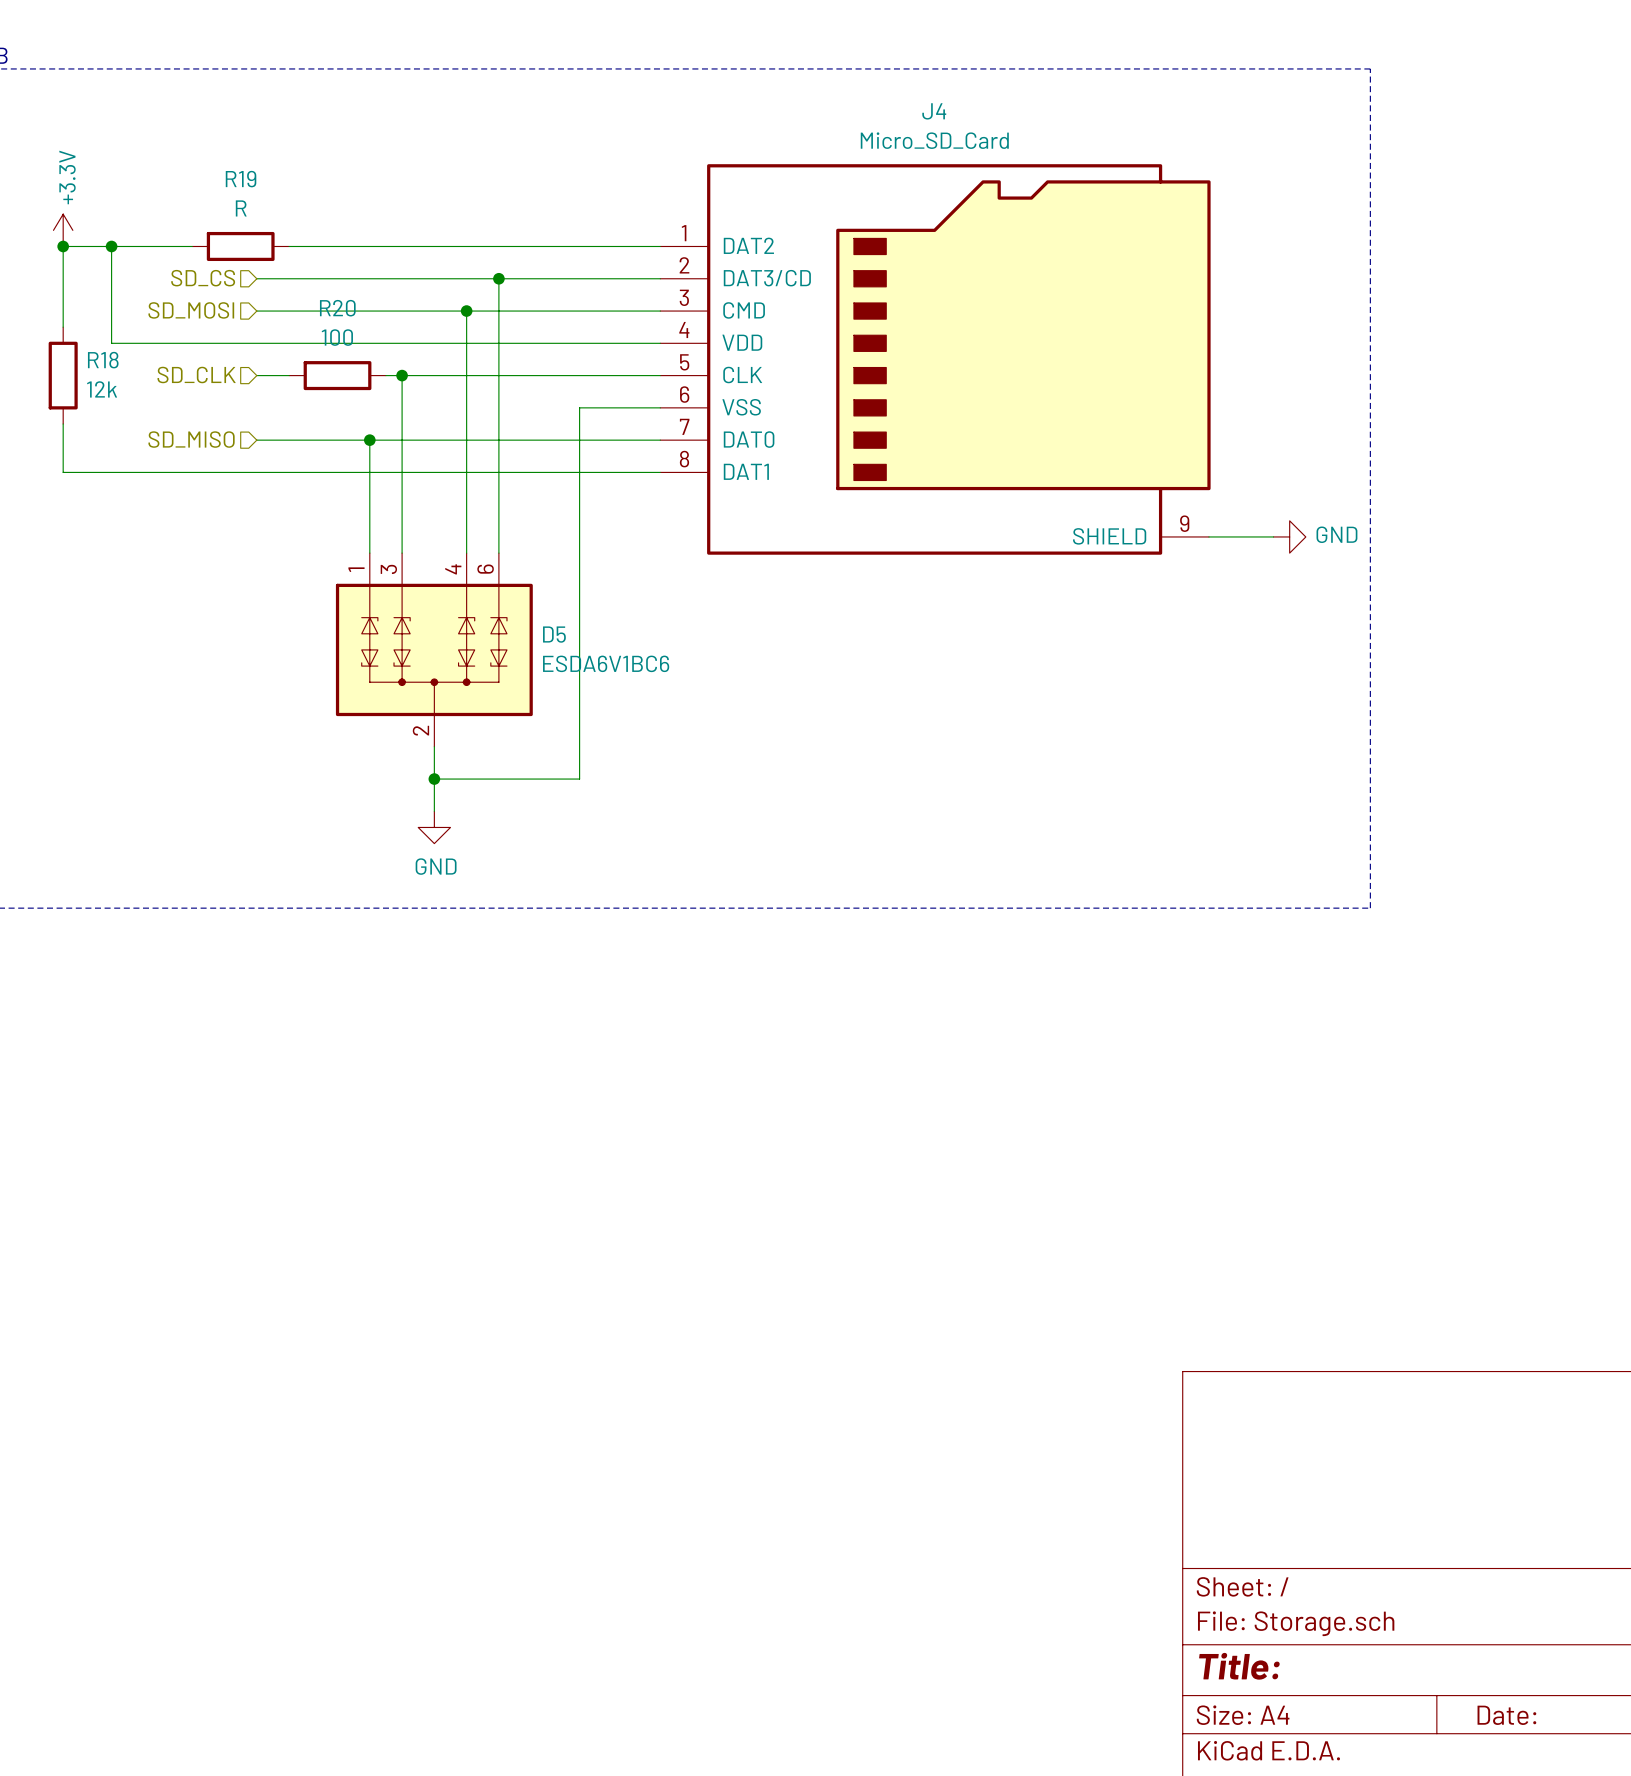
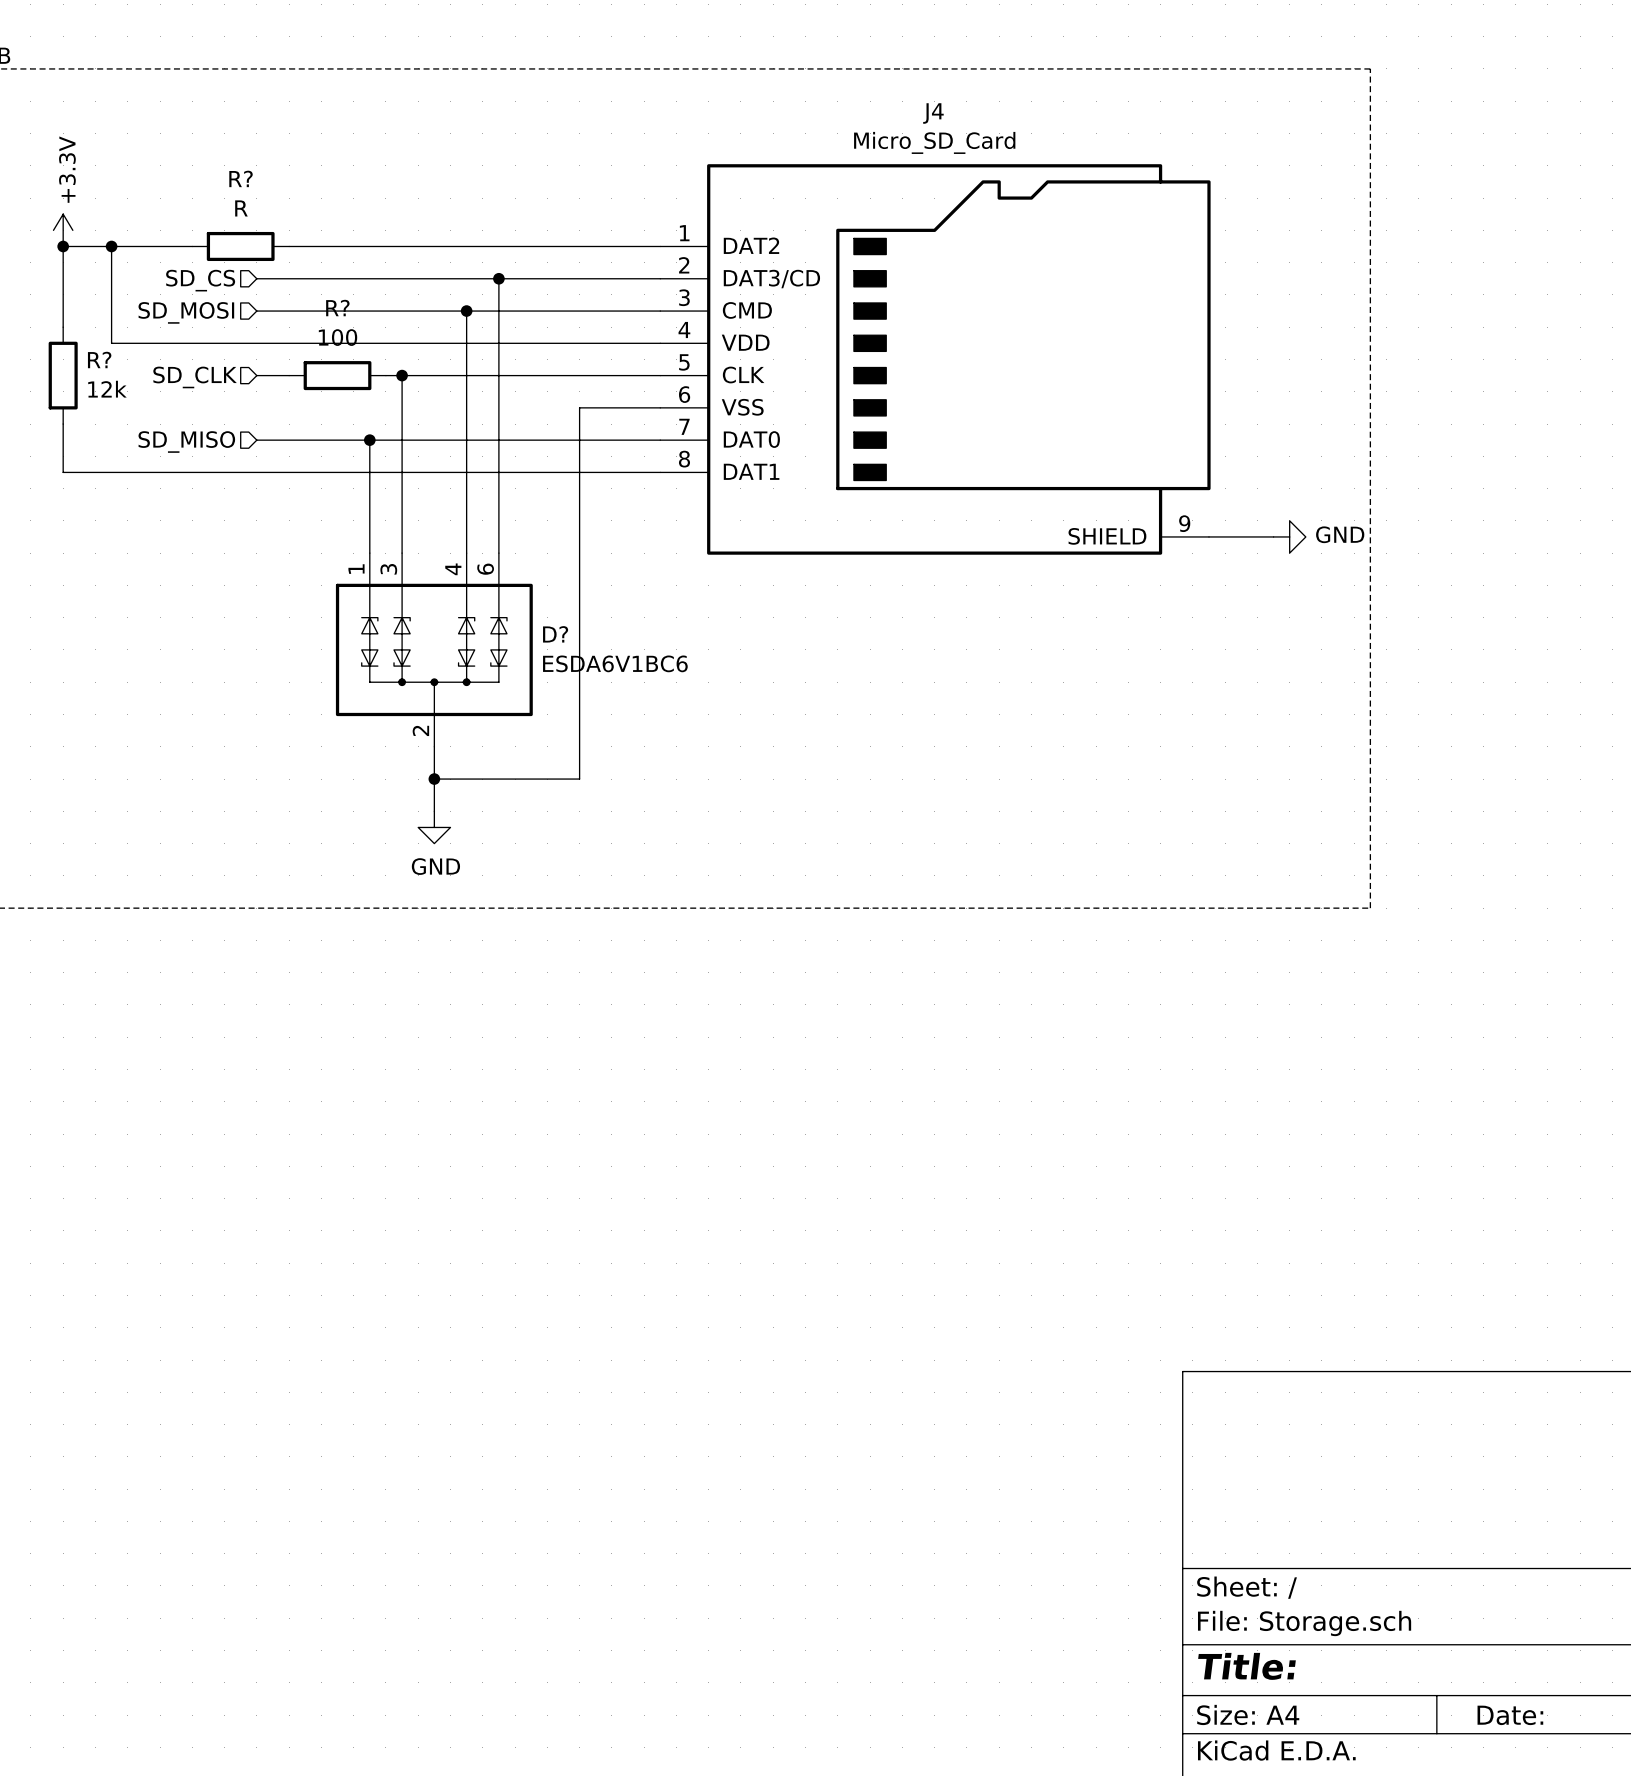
R19 name: R19 (241, 179) -> R? (241, 178)
R20 name: R20 (337, 308) -> R? (337, 308)
R18 name: R18 (103, 360) -> R? (99, 359)
D5 name: D5 (554, 634) -> D? (555, 634)

